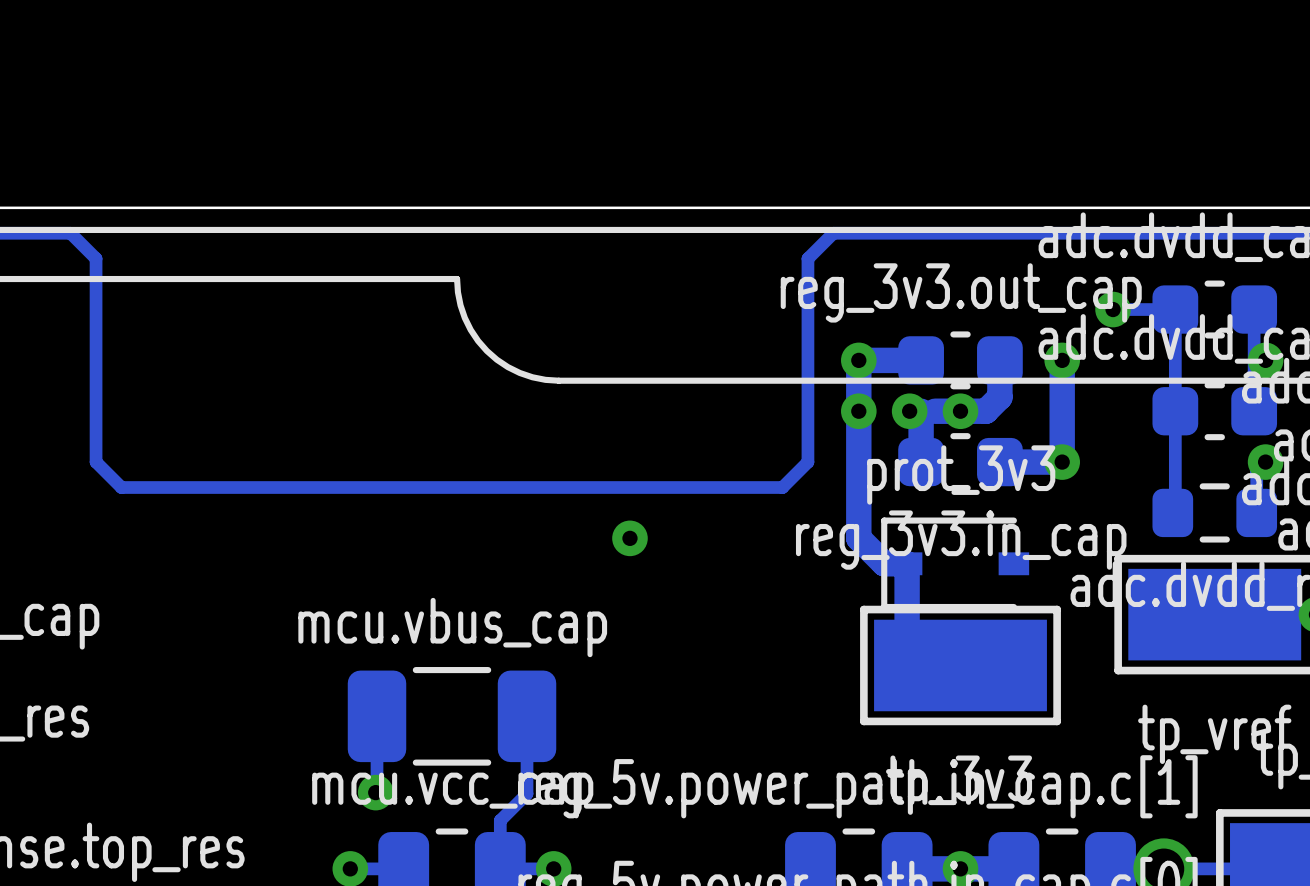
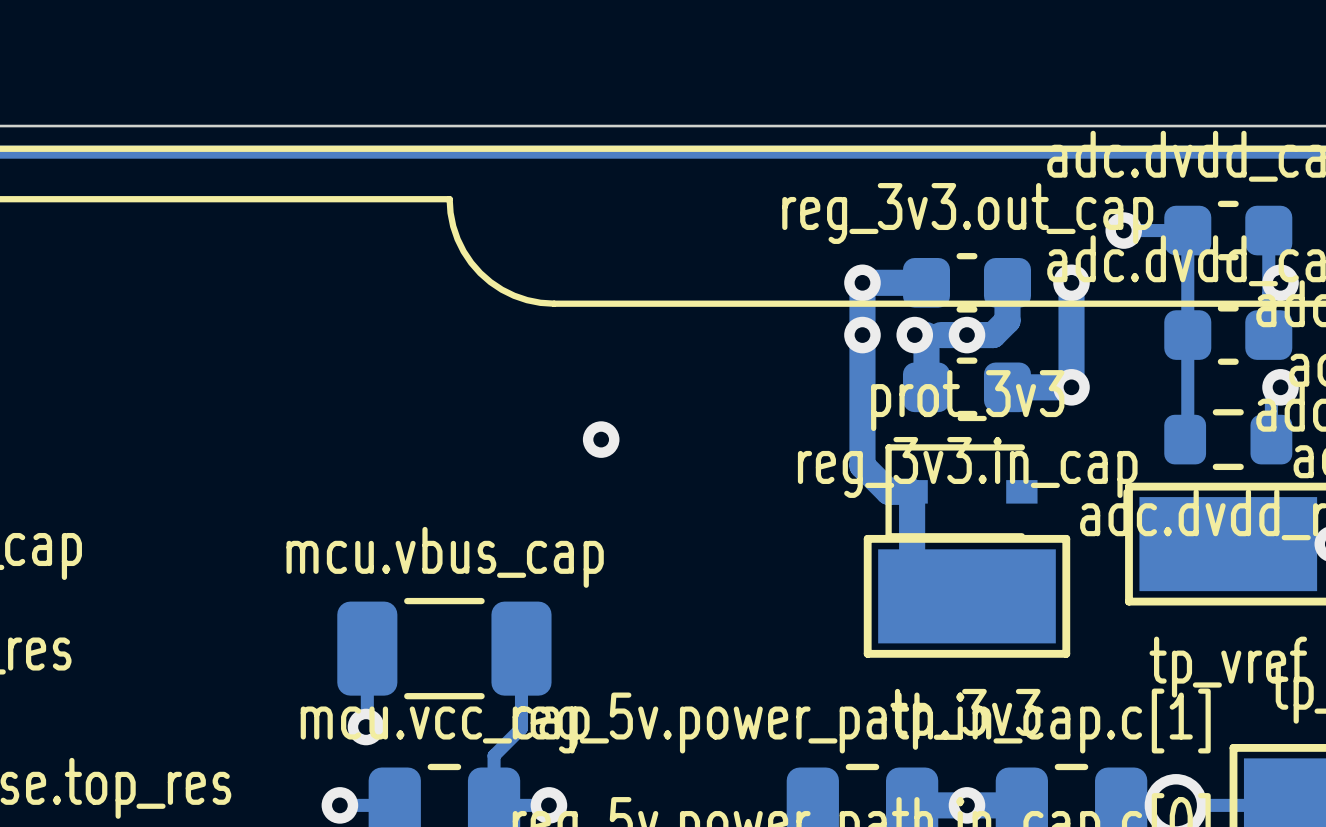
track: (833, 233) (807, 258) (807, 462) (782, 487) (121, 487) (96, 462) (96, 258) (70, 233) -> (836, 152) (52, 152)
via position: (629, 538) -> (601, 439)

